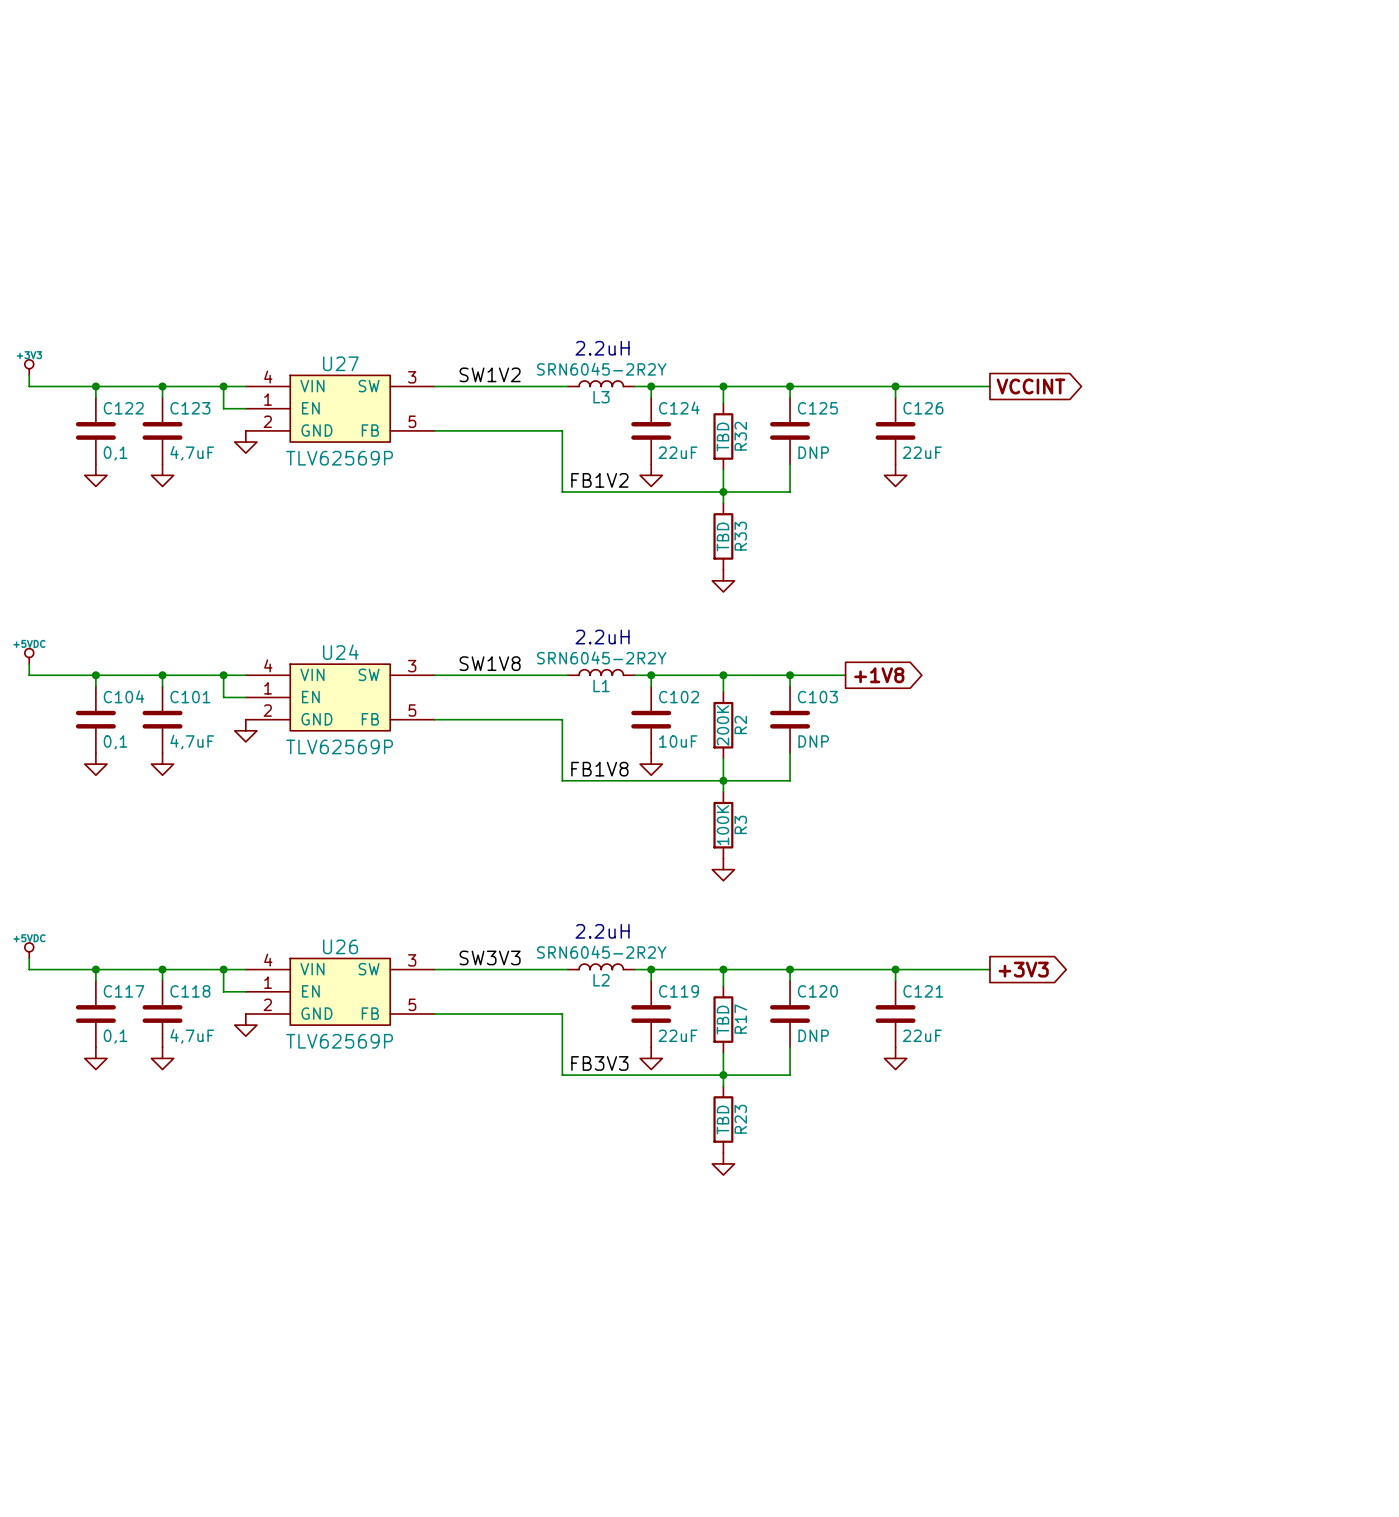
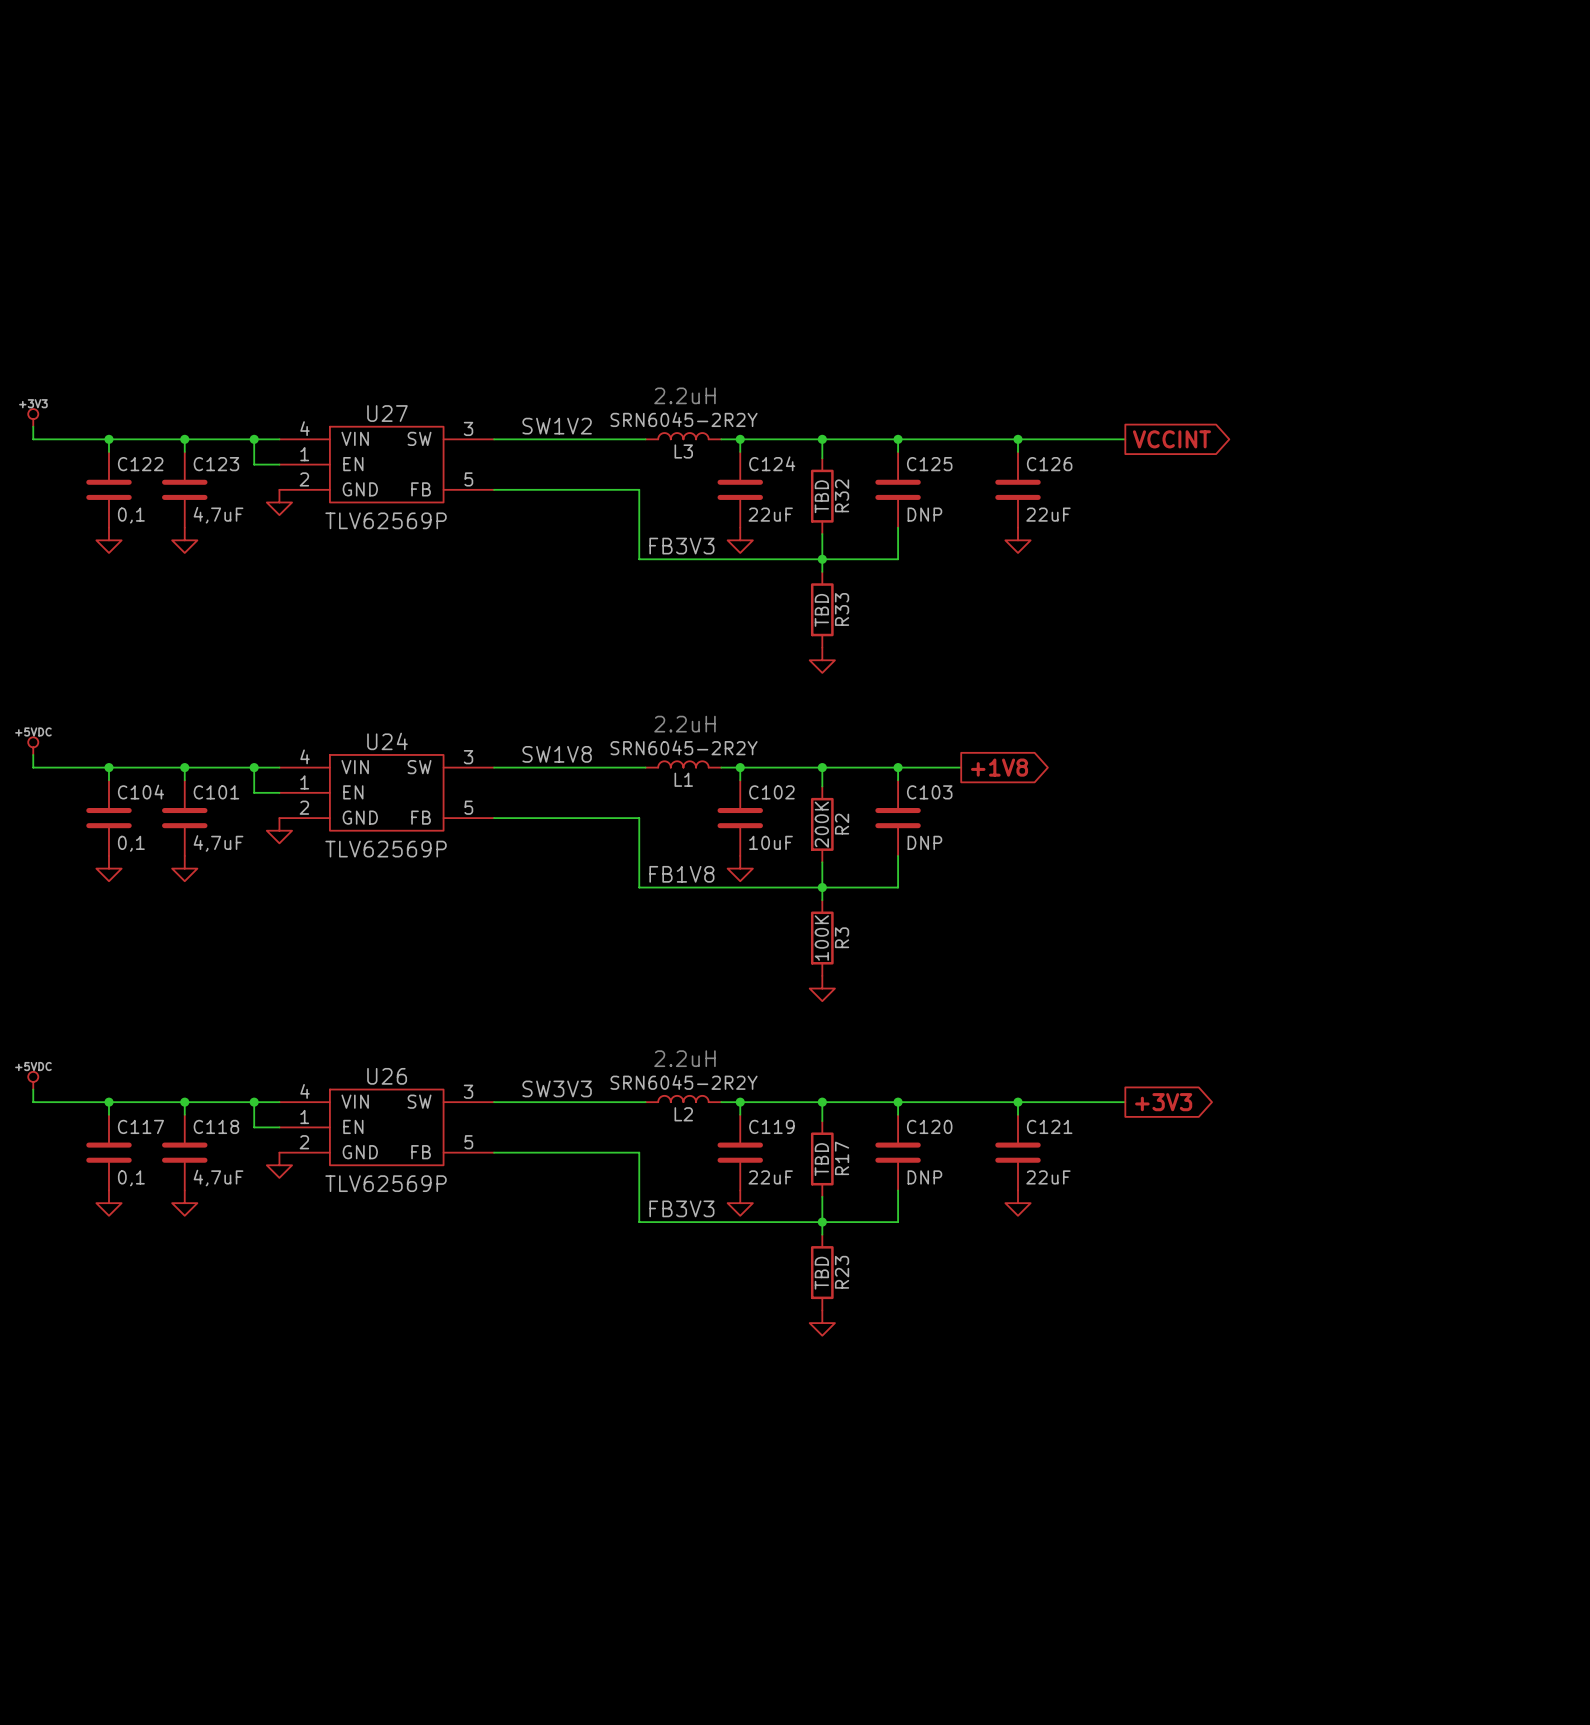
label: FB1V2 (599, 480) -> FB3V3 (681, 546)

